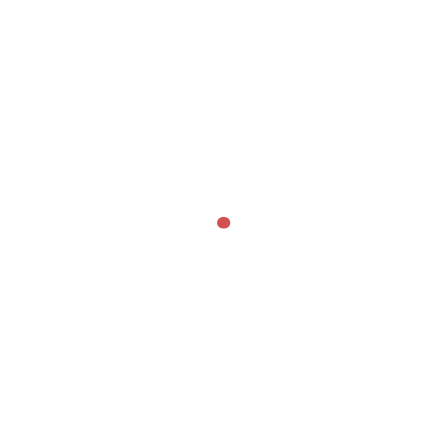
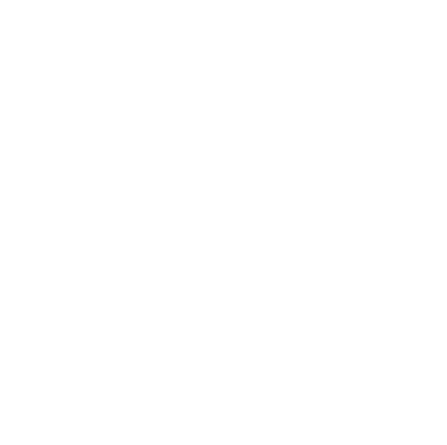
top track: (222, 222) (224, 222) -> none

